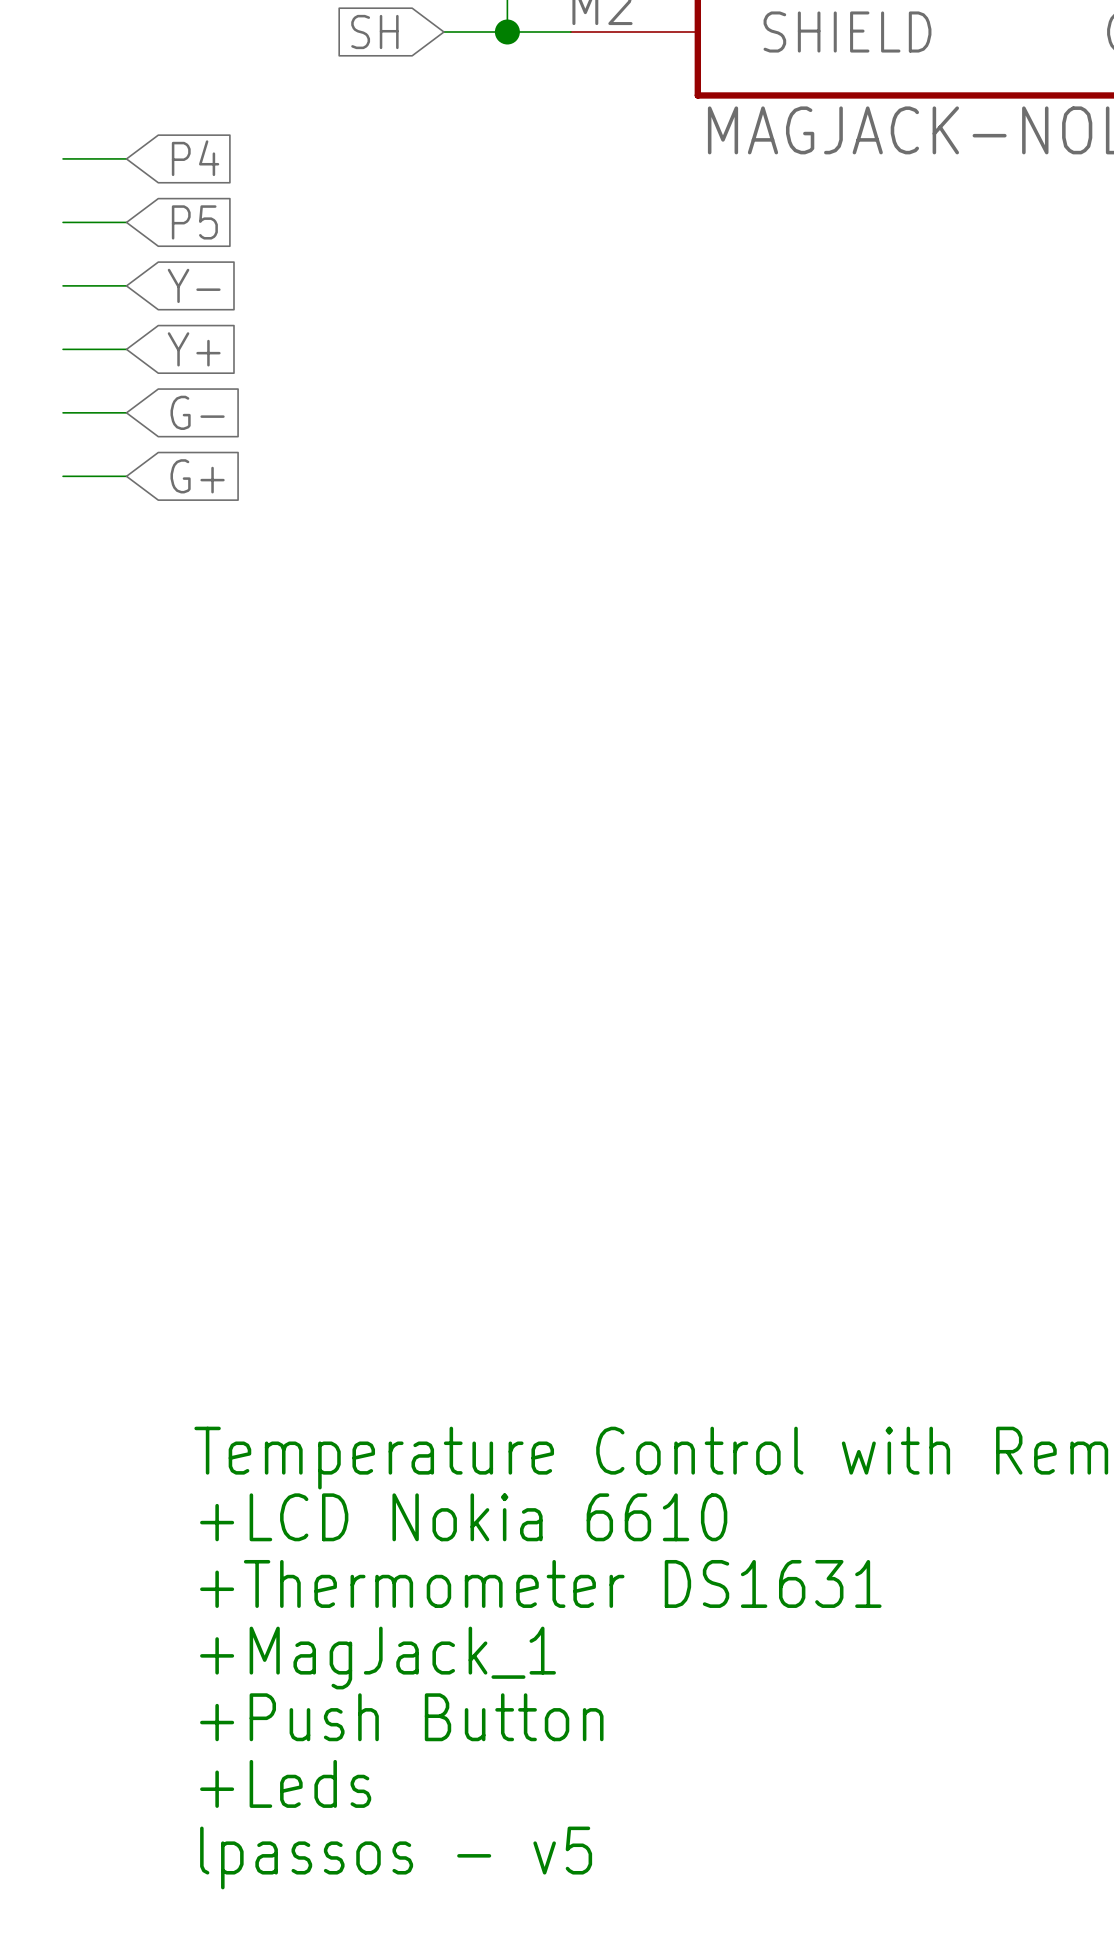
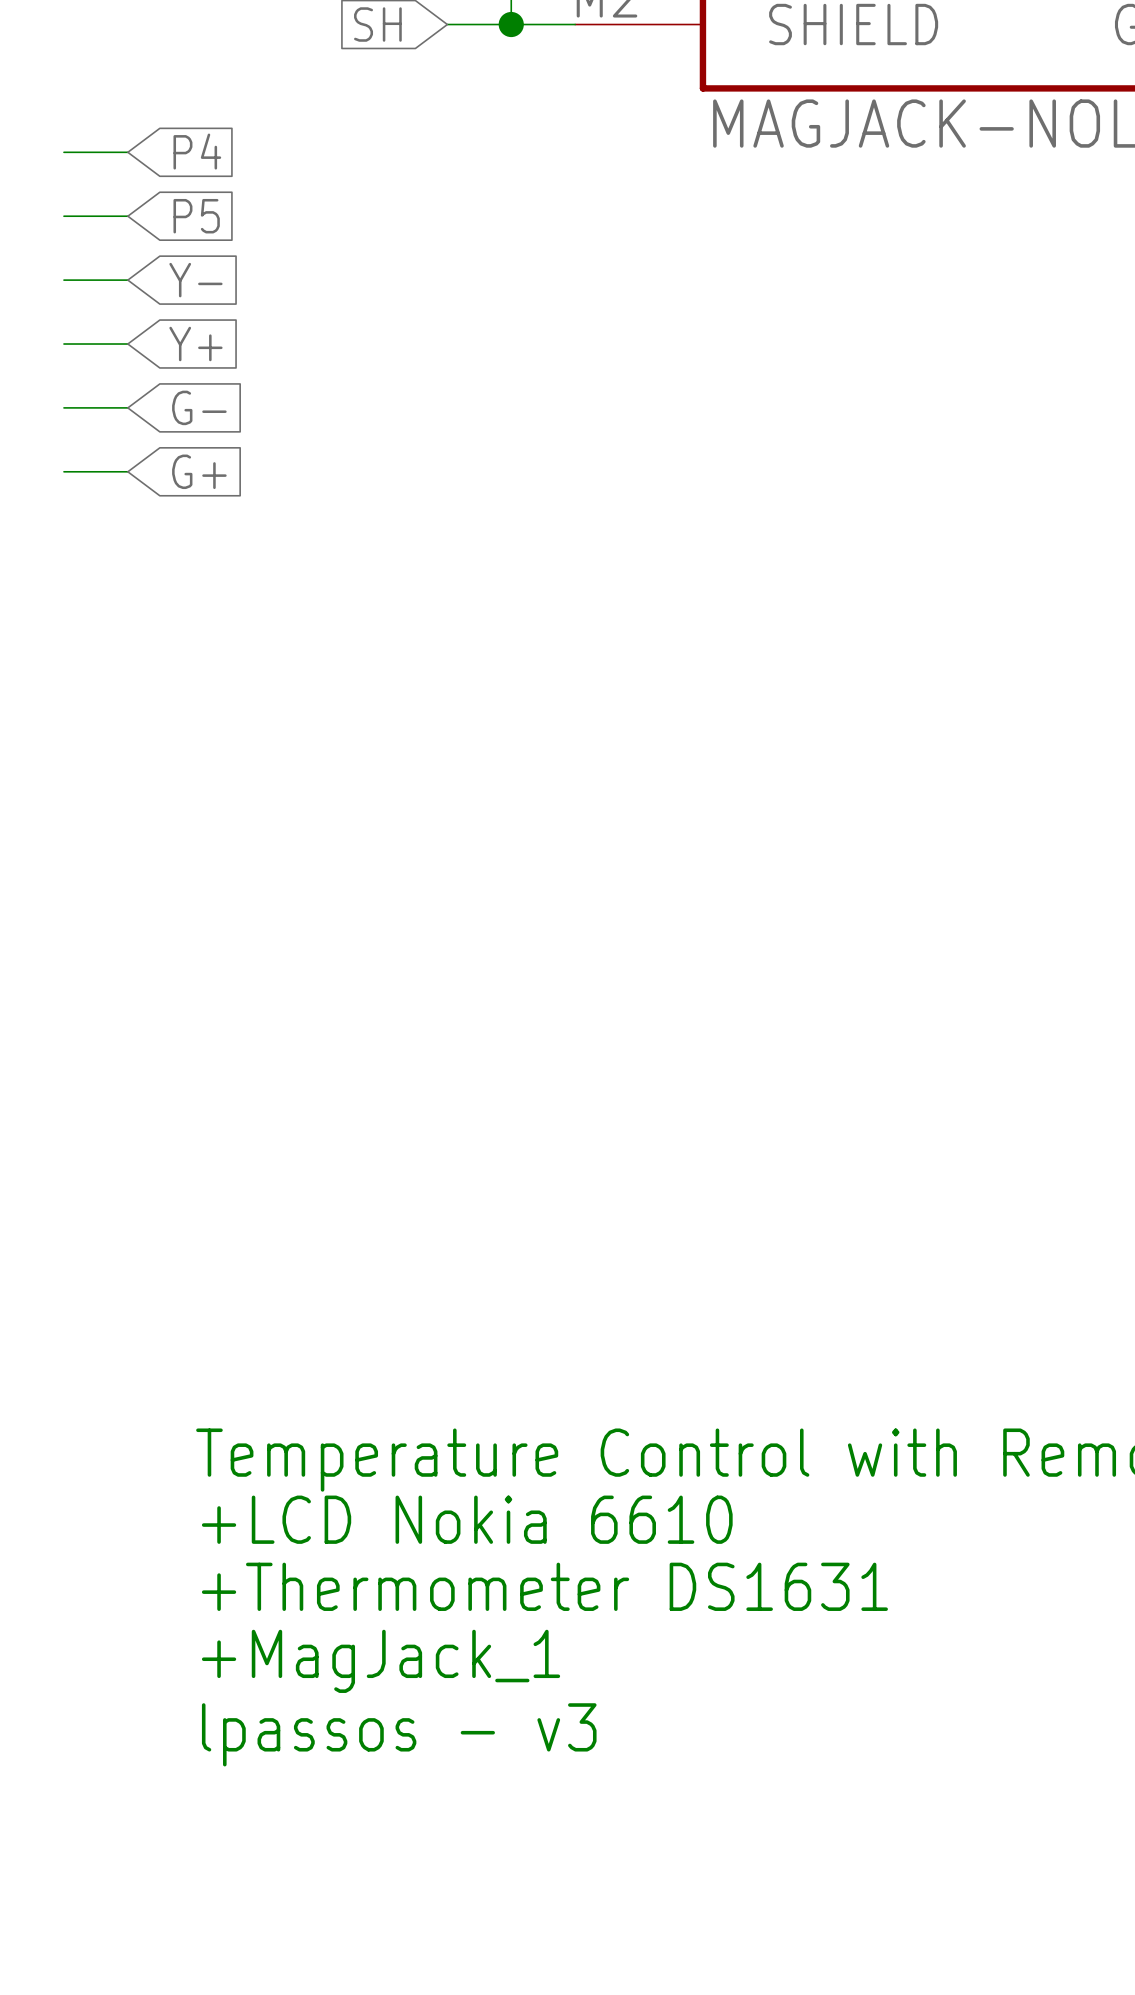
text: +Push Button (401, 1717) -> lpassos - v3 (399, 1734)
text: +Leds (285, 1783) -> none
text: lpassos - v5 (396, 1857) -> none

